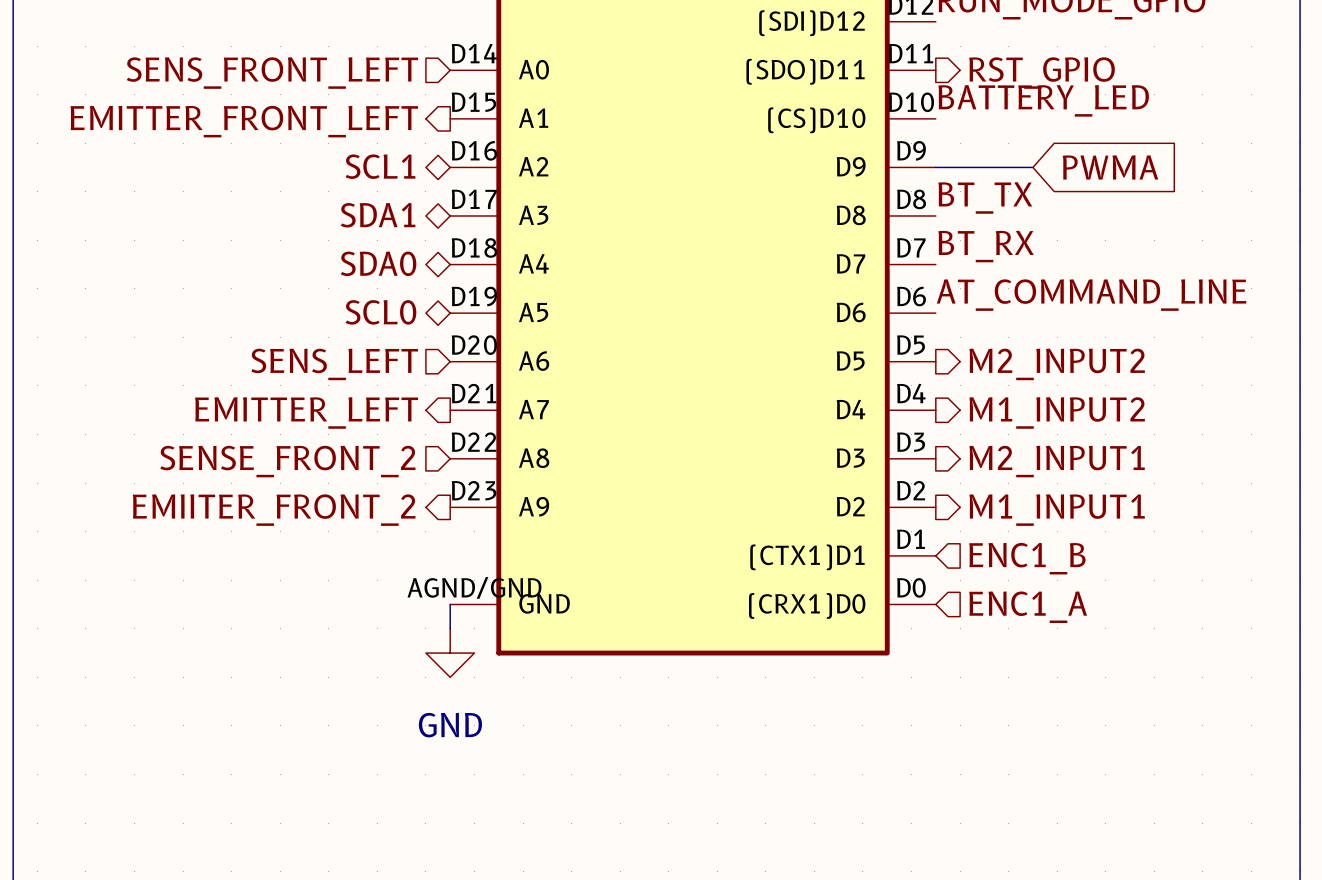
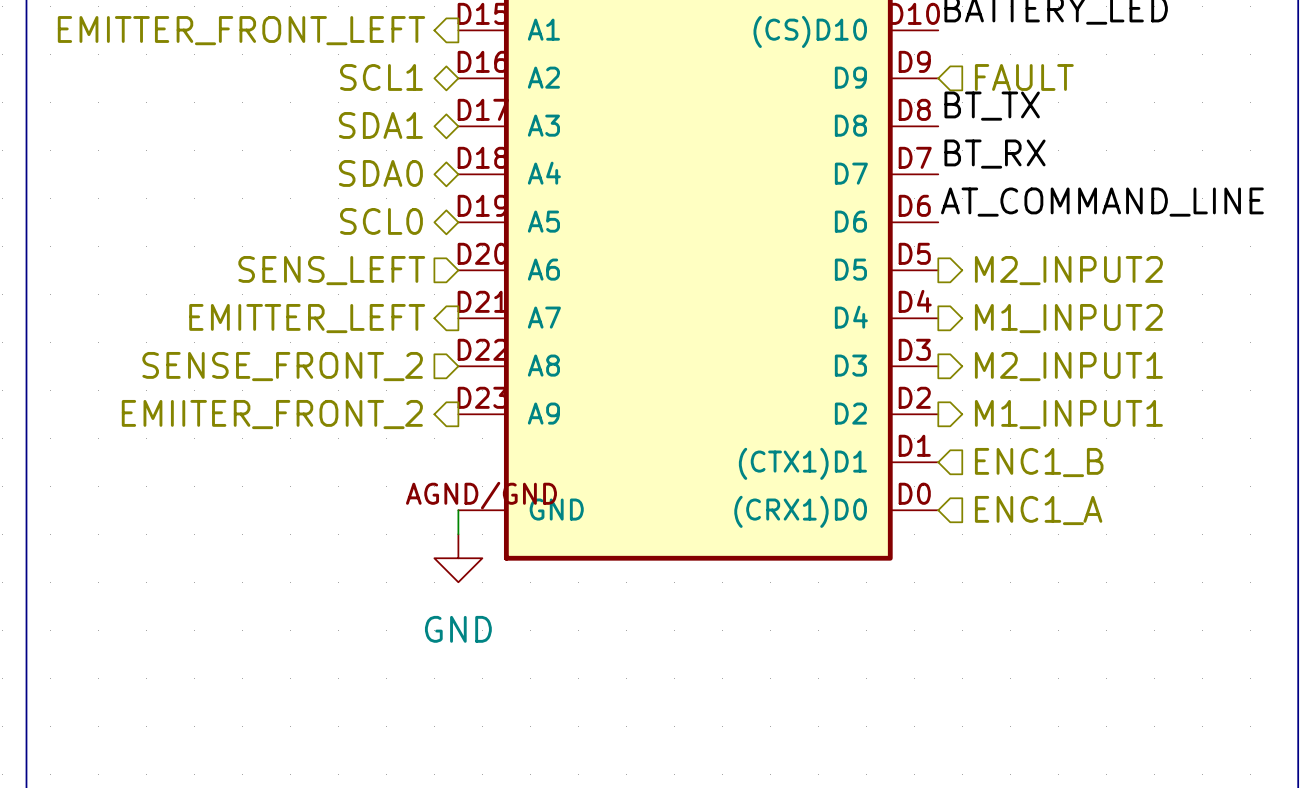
hierarchical label: none -> FAULT (1024, 77)
wire: (935, 167) (1032, 167) -> none
global label: PWMA (1110, 167) -> none

